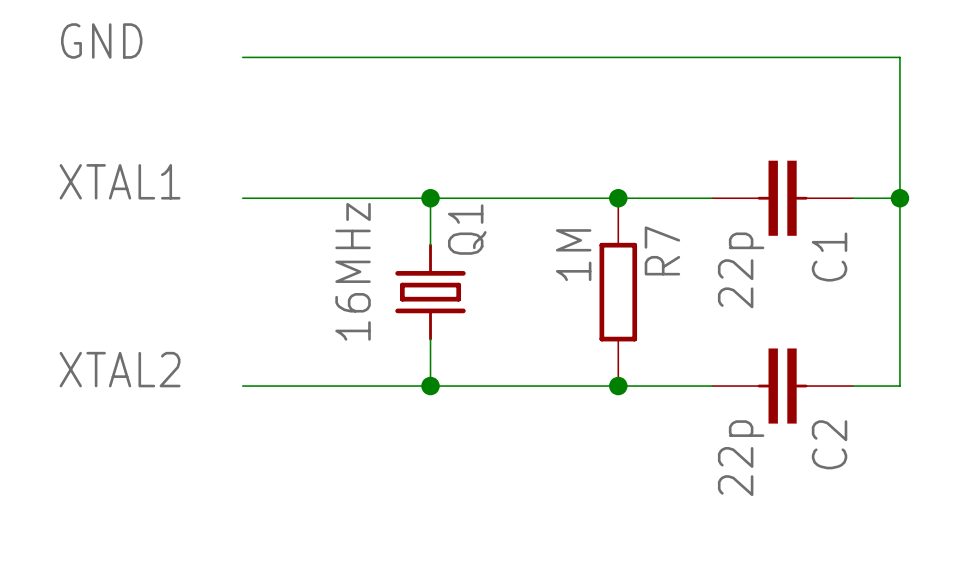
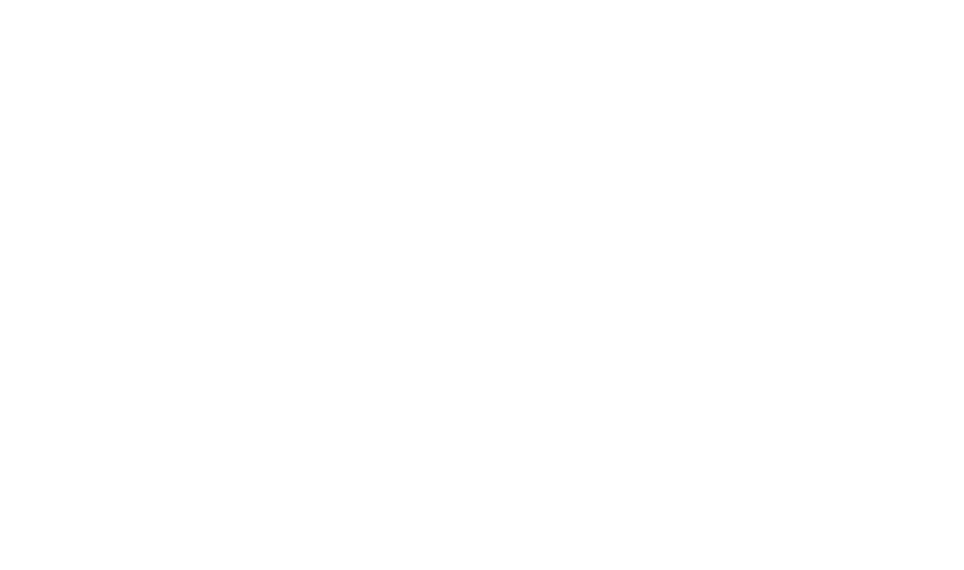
label: GND (101, 40) -> none
wire: (242, 57) (899, 57) (899, 386) (853, 386) -> none
label: XTAL1 (120, 181) -> none
wire: (242, 198) (712, 198) -> none
wire: (430, 198) (430, 245) -> none
junction: (430, 198) -> none
junction: (618, 198) -> none
C1: 22p (782, 198) -> none
wire: (853, 198) (899, 198) -> none
junction: (899, 198) -> none
Q1: 16MHz (430, 292) -> none
R7: 1M (618, 292) -> none
wire: (430, 339) (430, 386) -> none
label: XTAL2 (120, 369) -> none
wire: (242, 386) (712, 386) -> none
junction: (430, 386) -> none
junction: (618, 386) -> none
C2: 22p (782, 386) -> none

